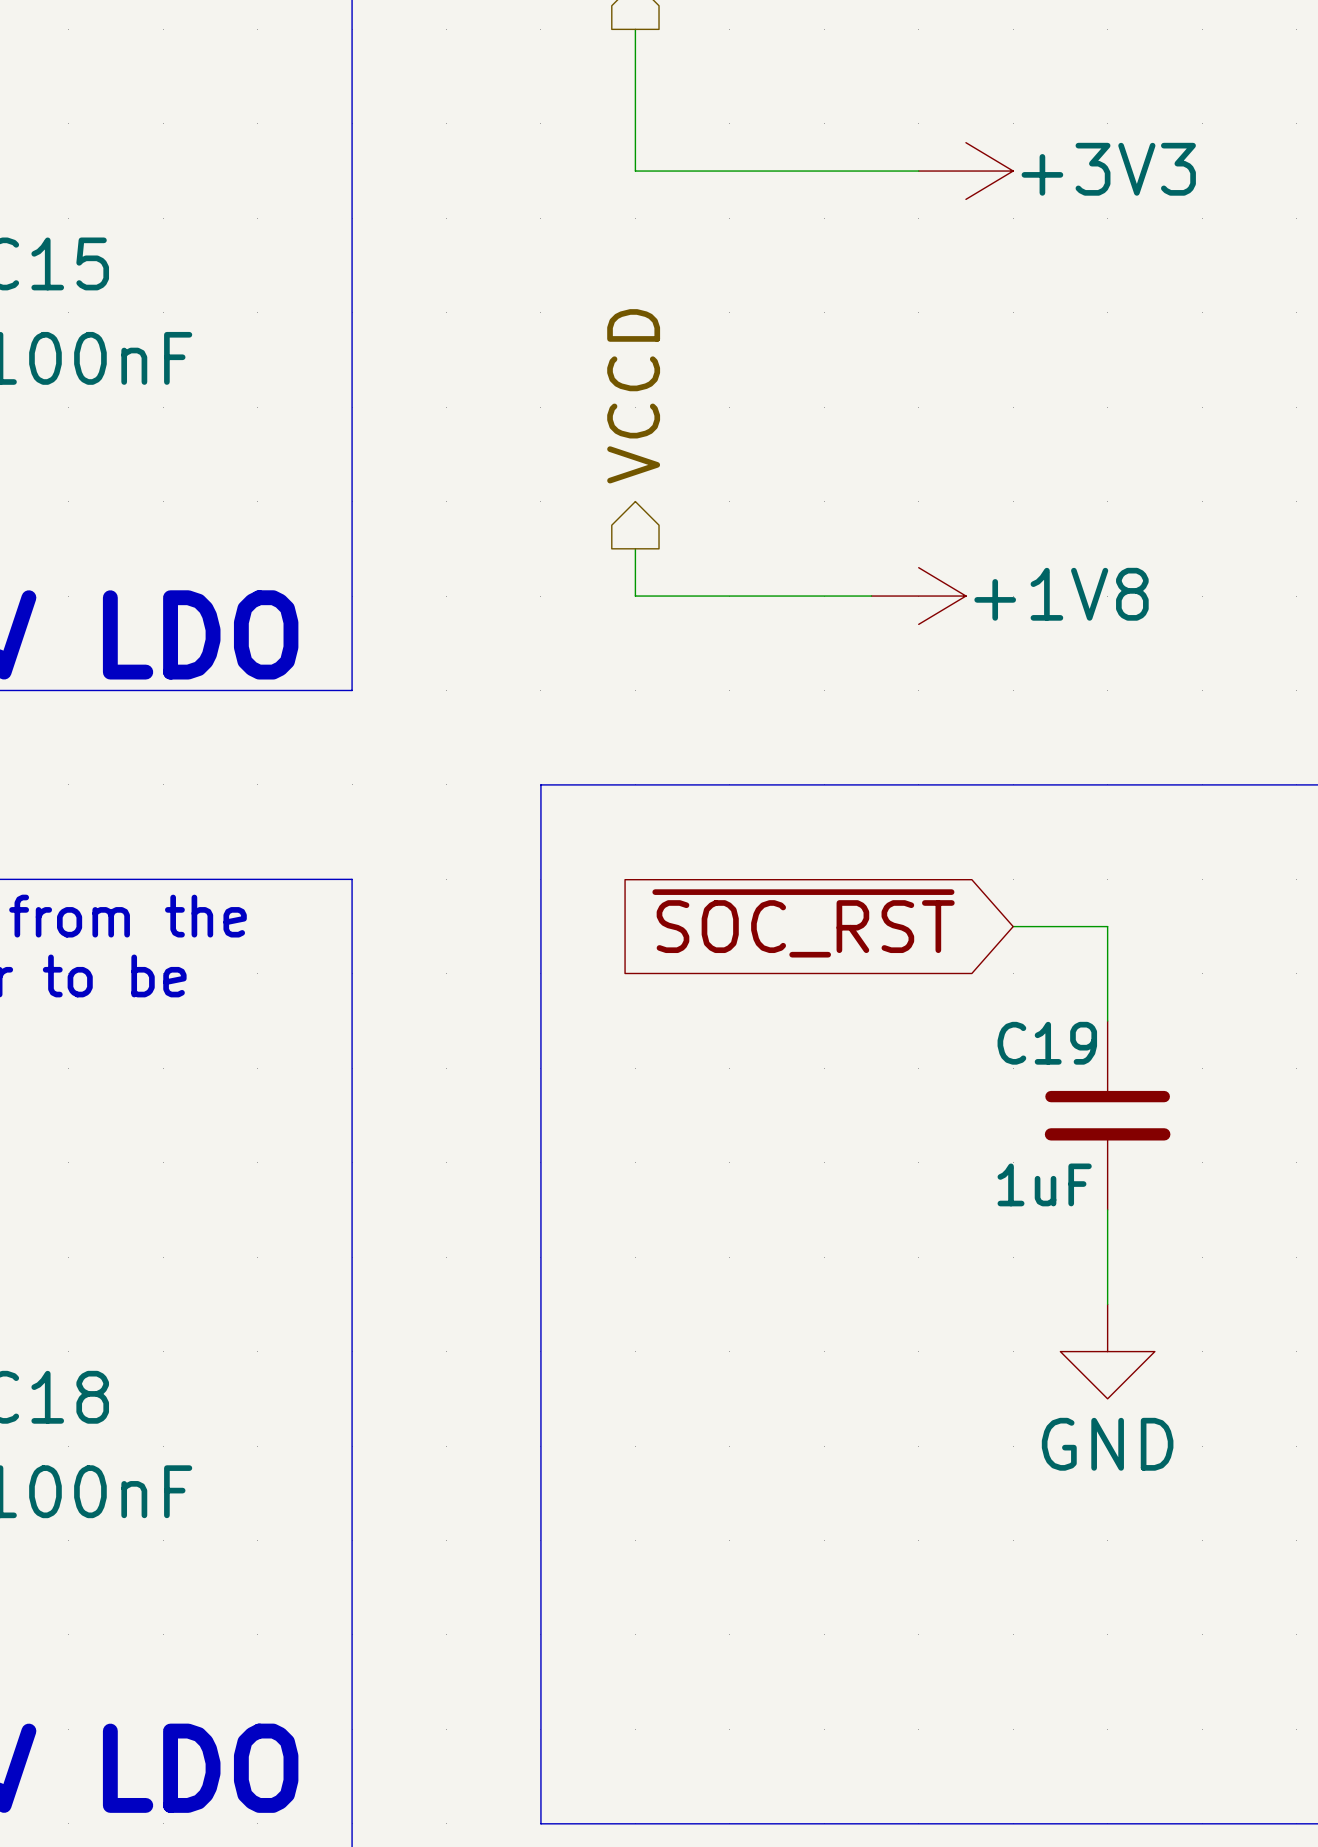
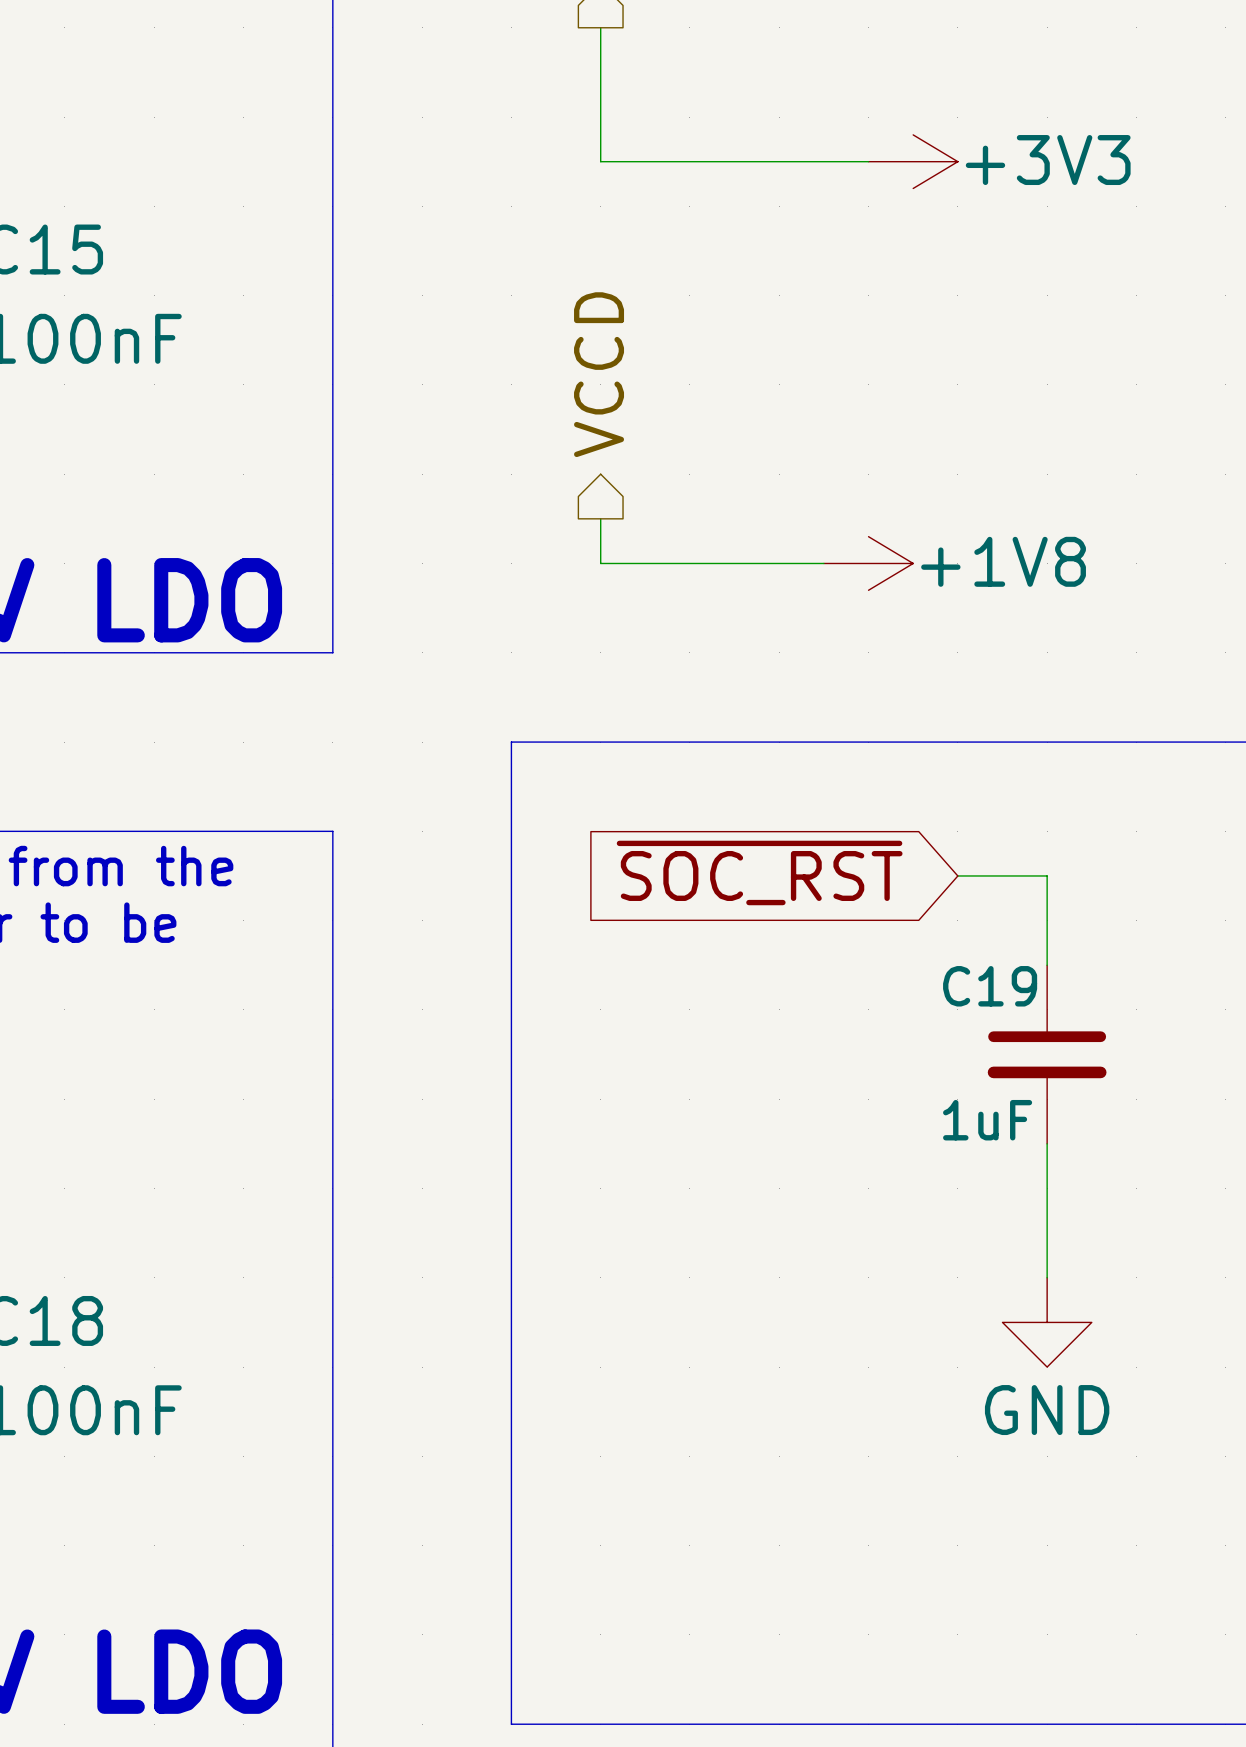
power symbol position: GND (1107, 1351) -> GND (1047, 1322)

